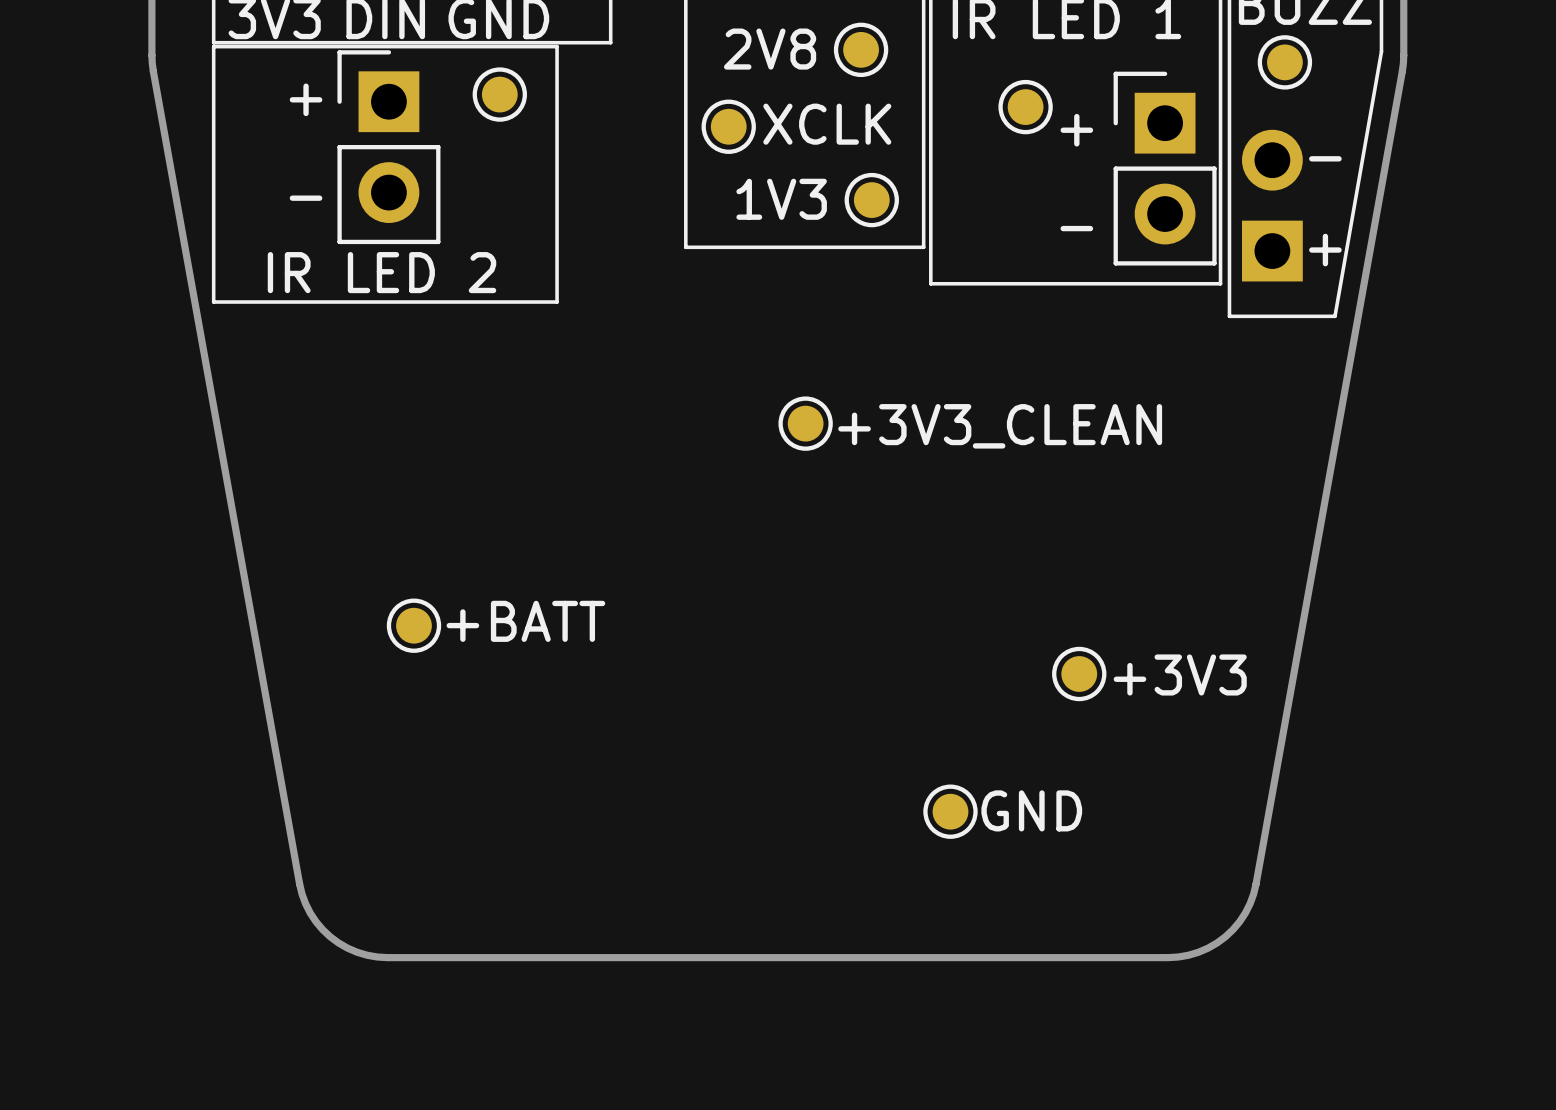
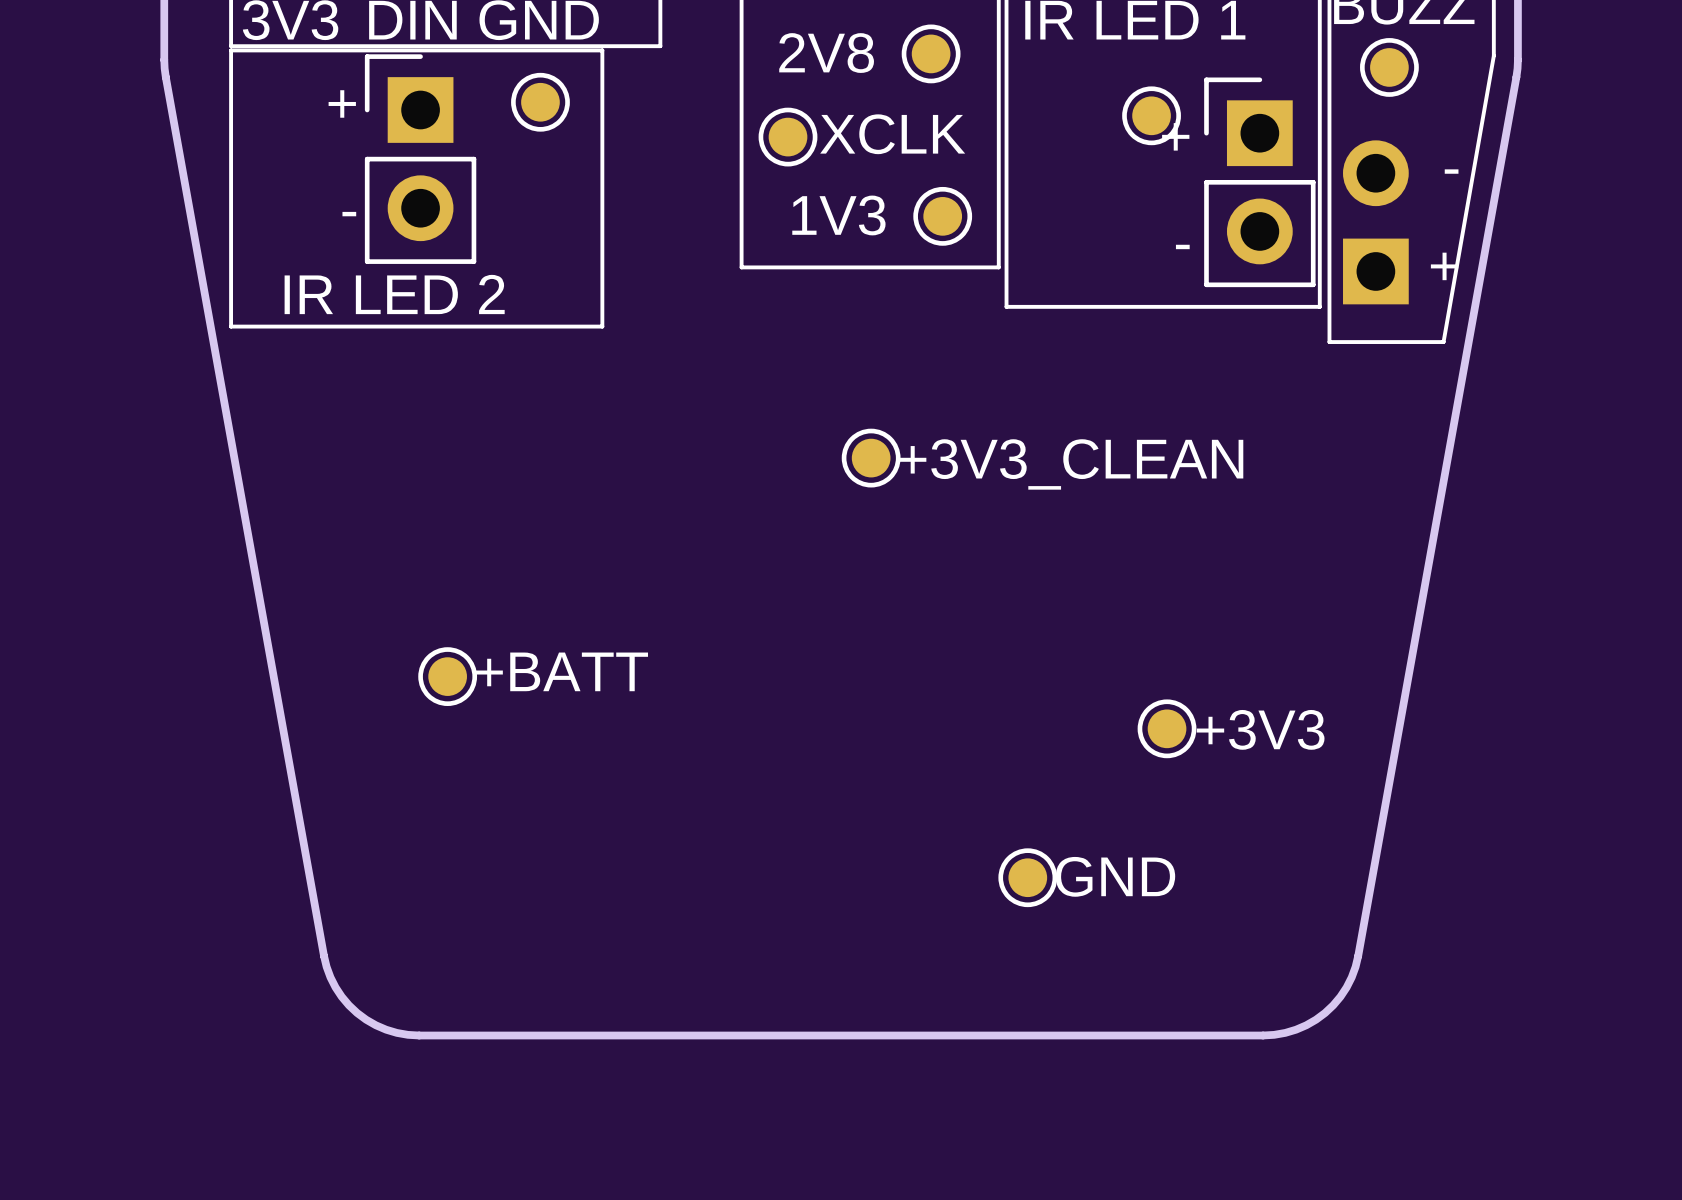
part position: (1025, 107) -> (1151, 115)

